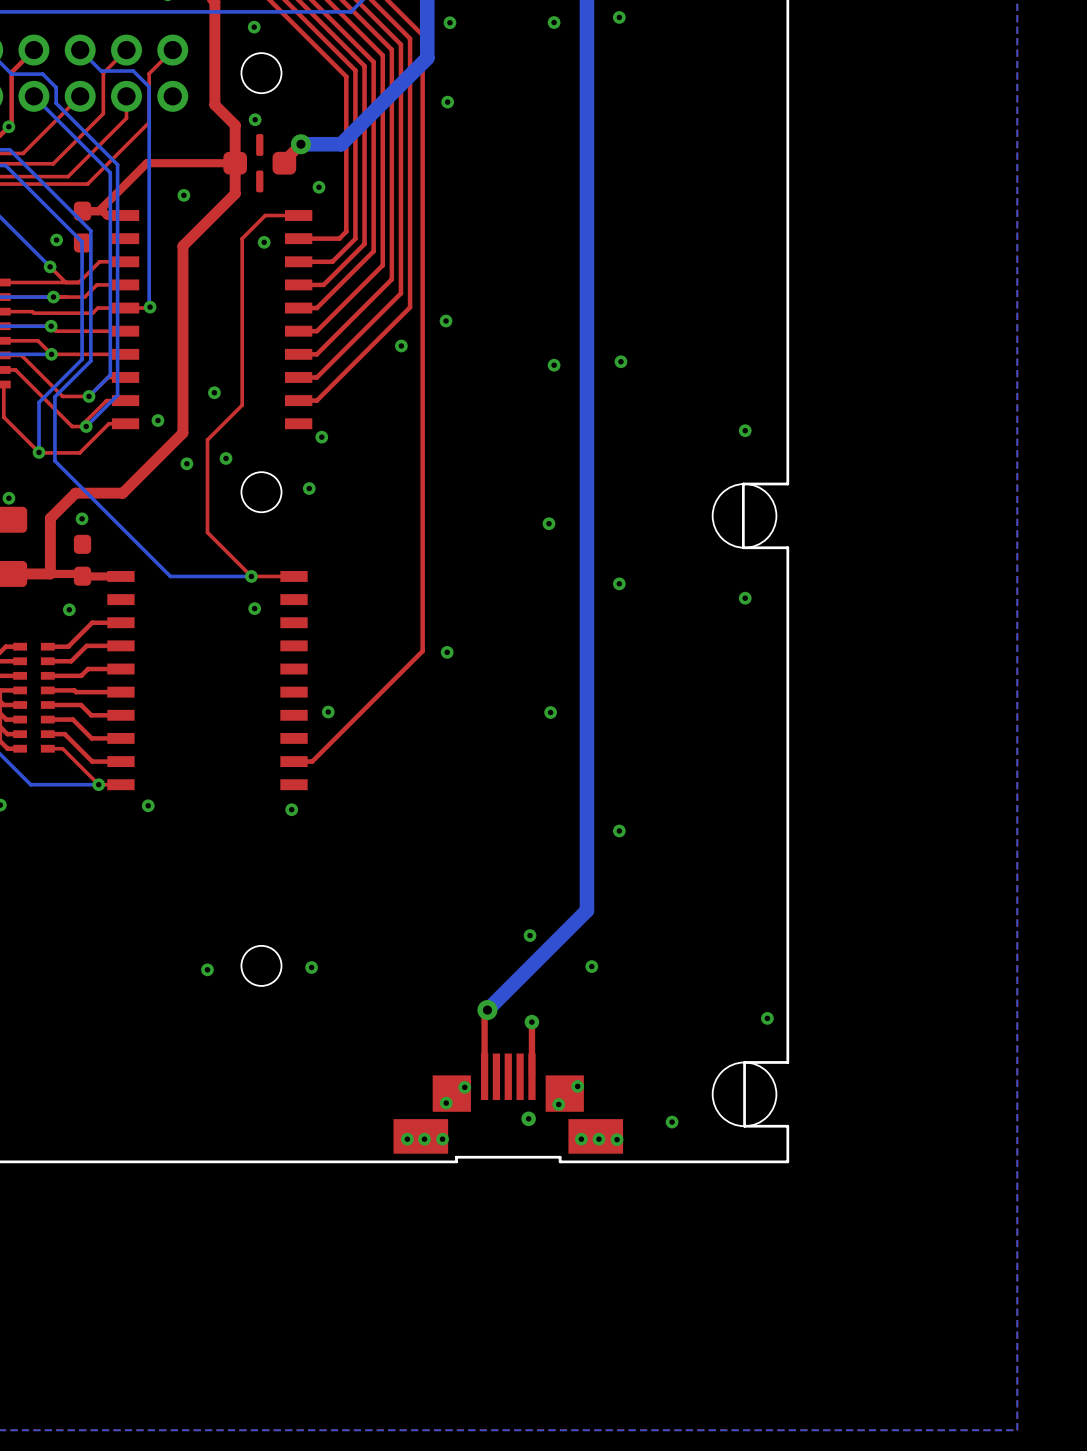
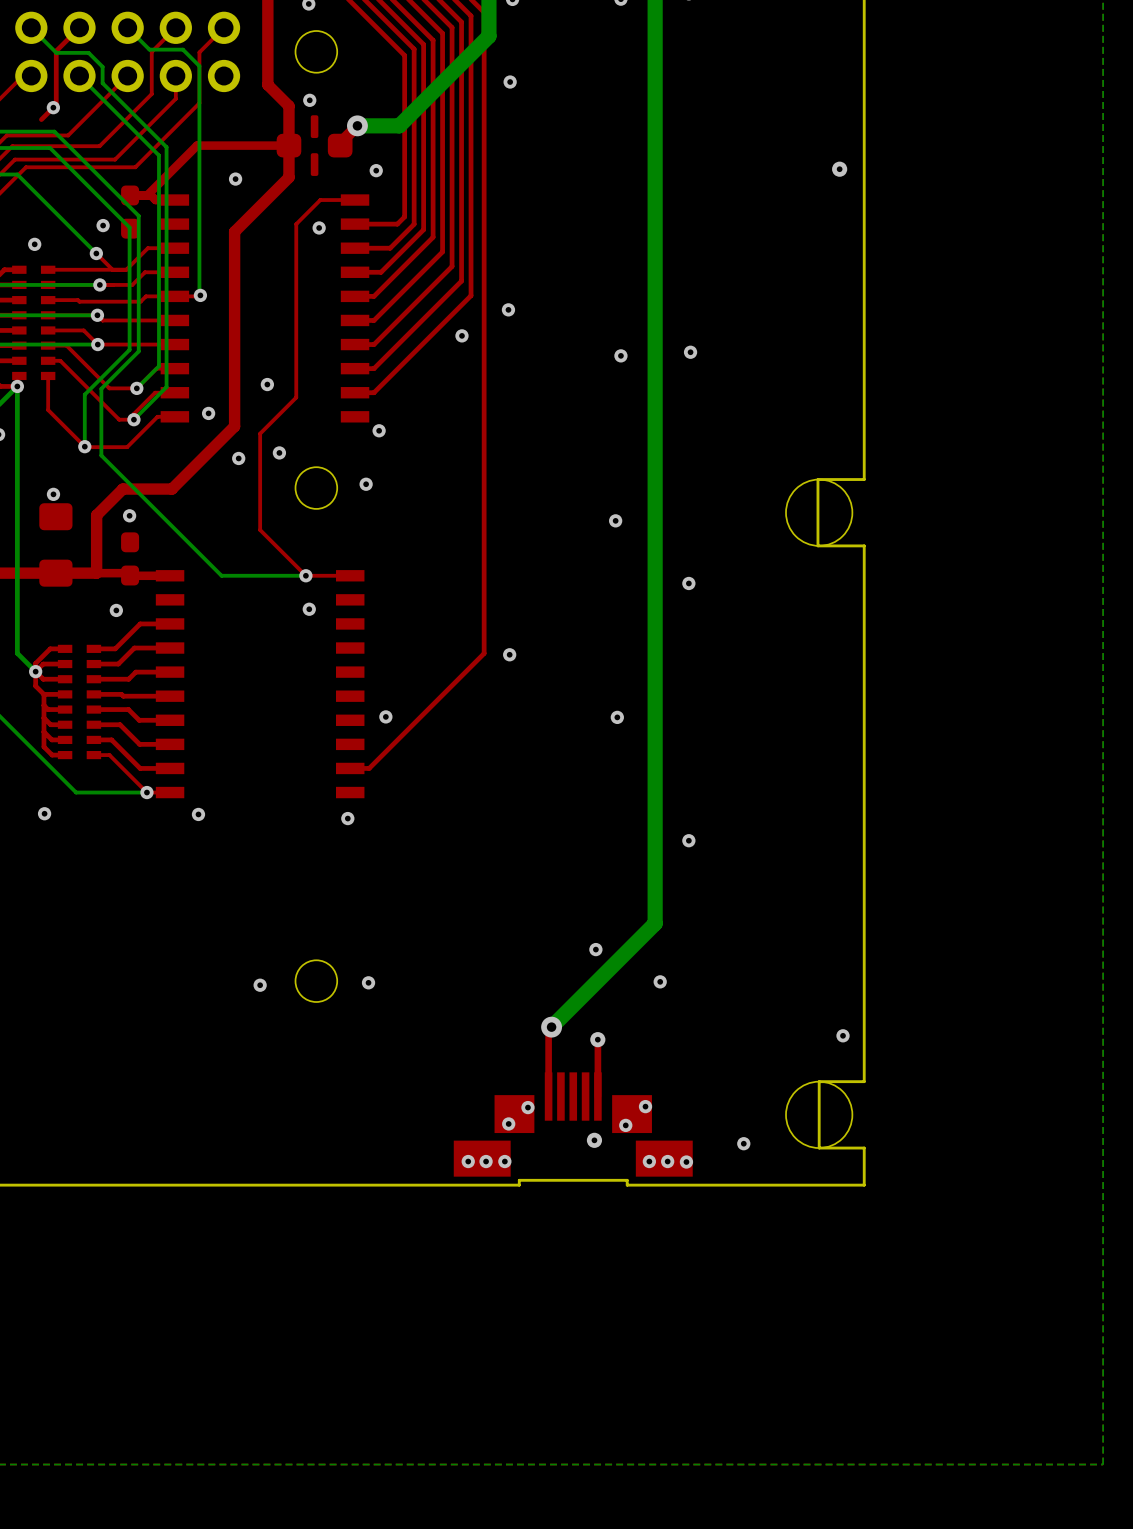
via: none -> (839, 169)
via: (745, 430) -> none
via: (745, 598) -> none

